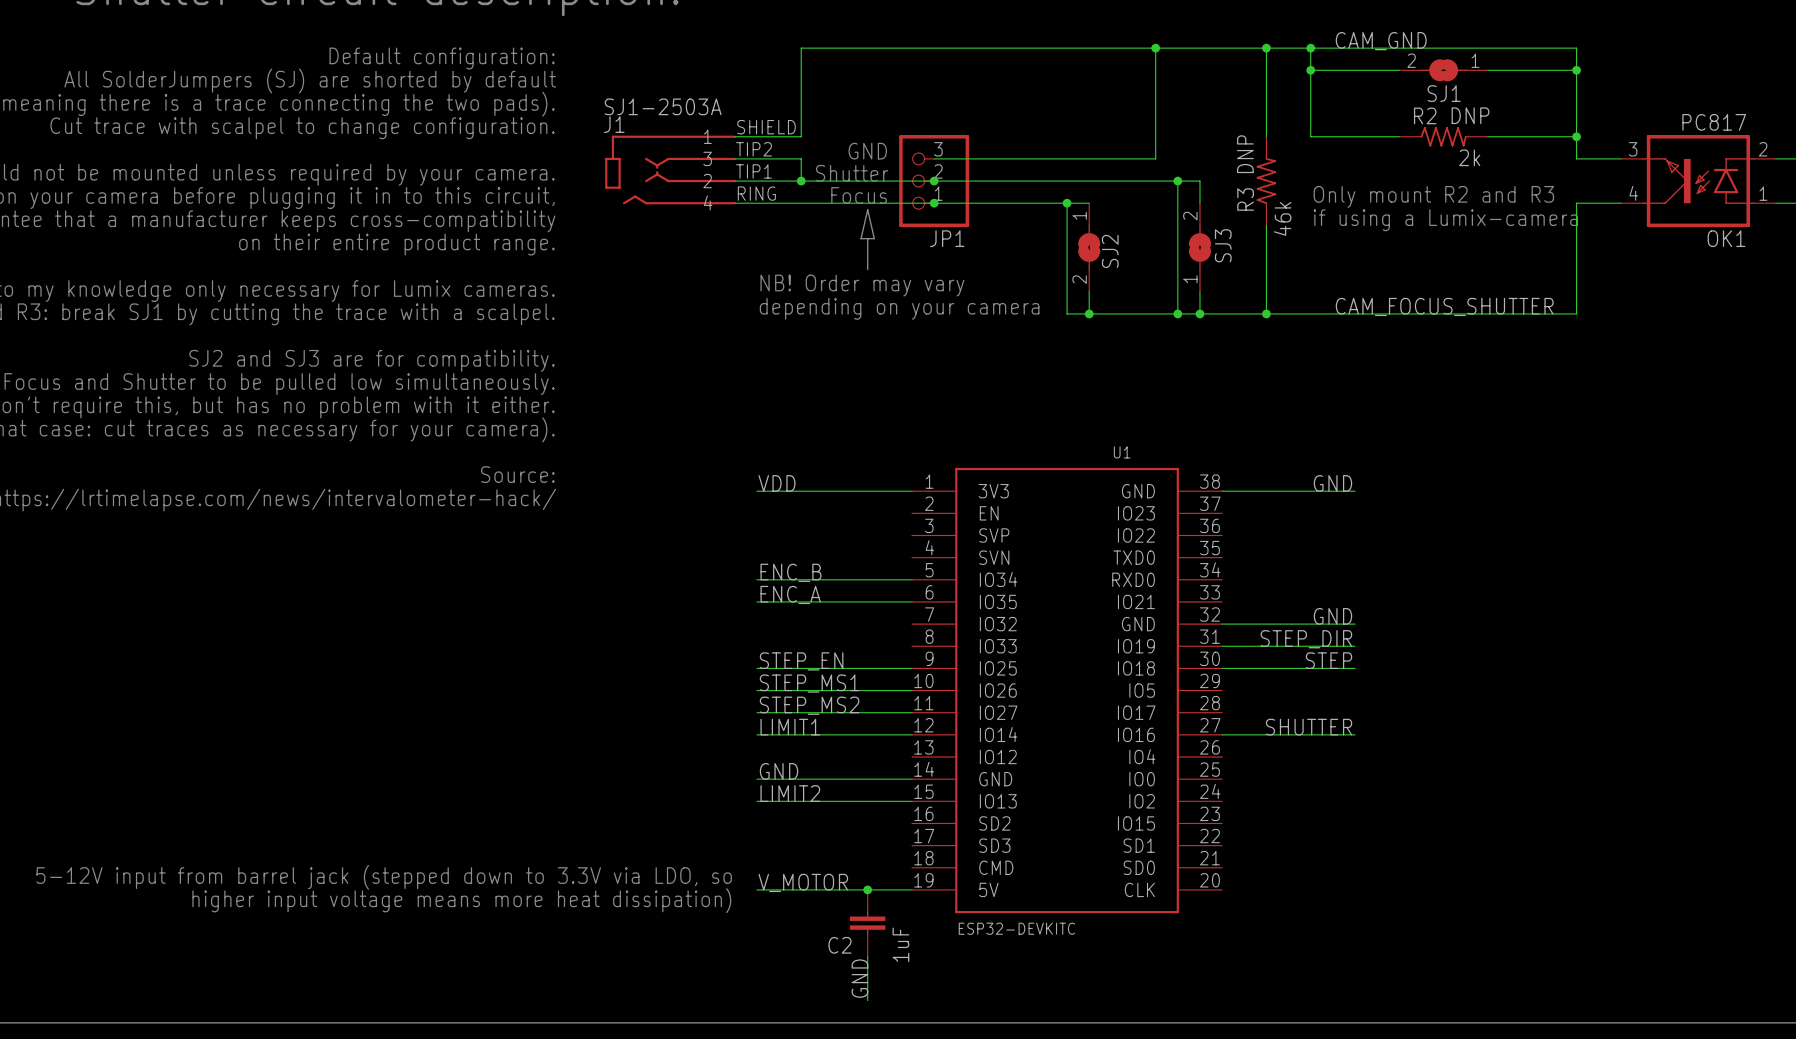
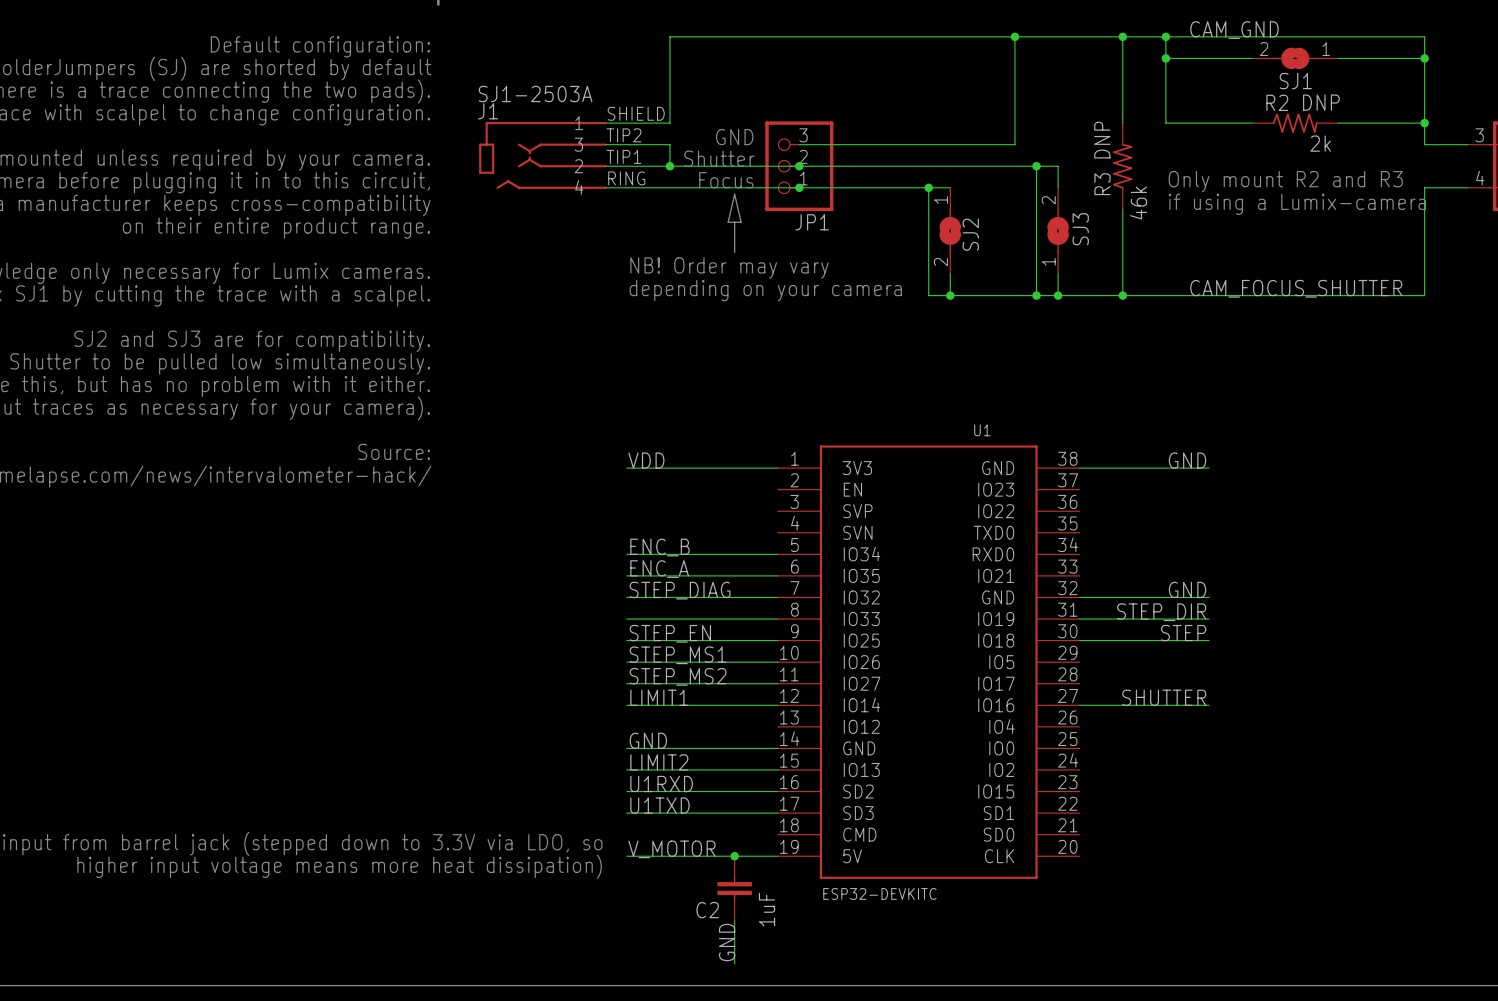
label: none -> STEP_DIAG (680, 590)
wire: none -> (626, 597) (777, 597)
wire: none -> (626, 619) (777, 619)
label: none -> U1RXD (661, 783)
wire: none -> (626, 791) (777, 791)
label: none -> U1TXD (659, 805)
wire: none -> (626, 813) (777, 813)

